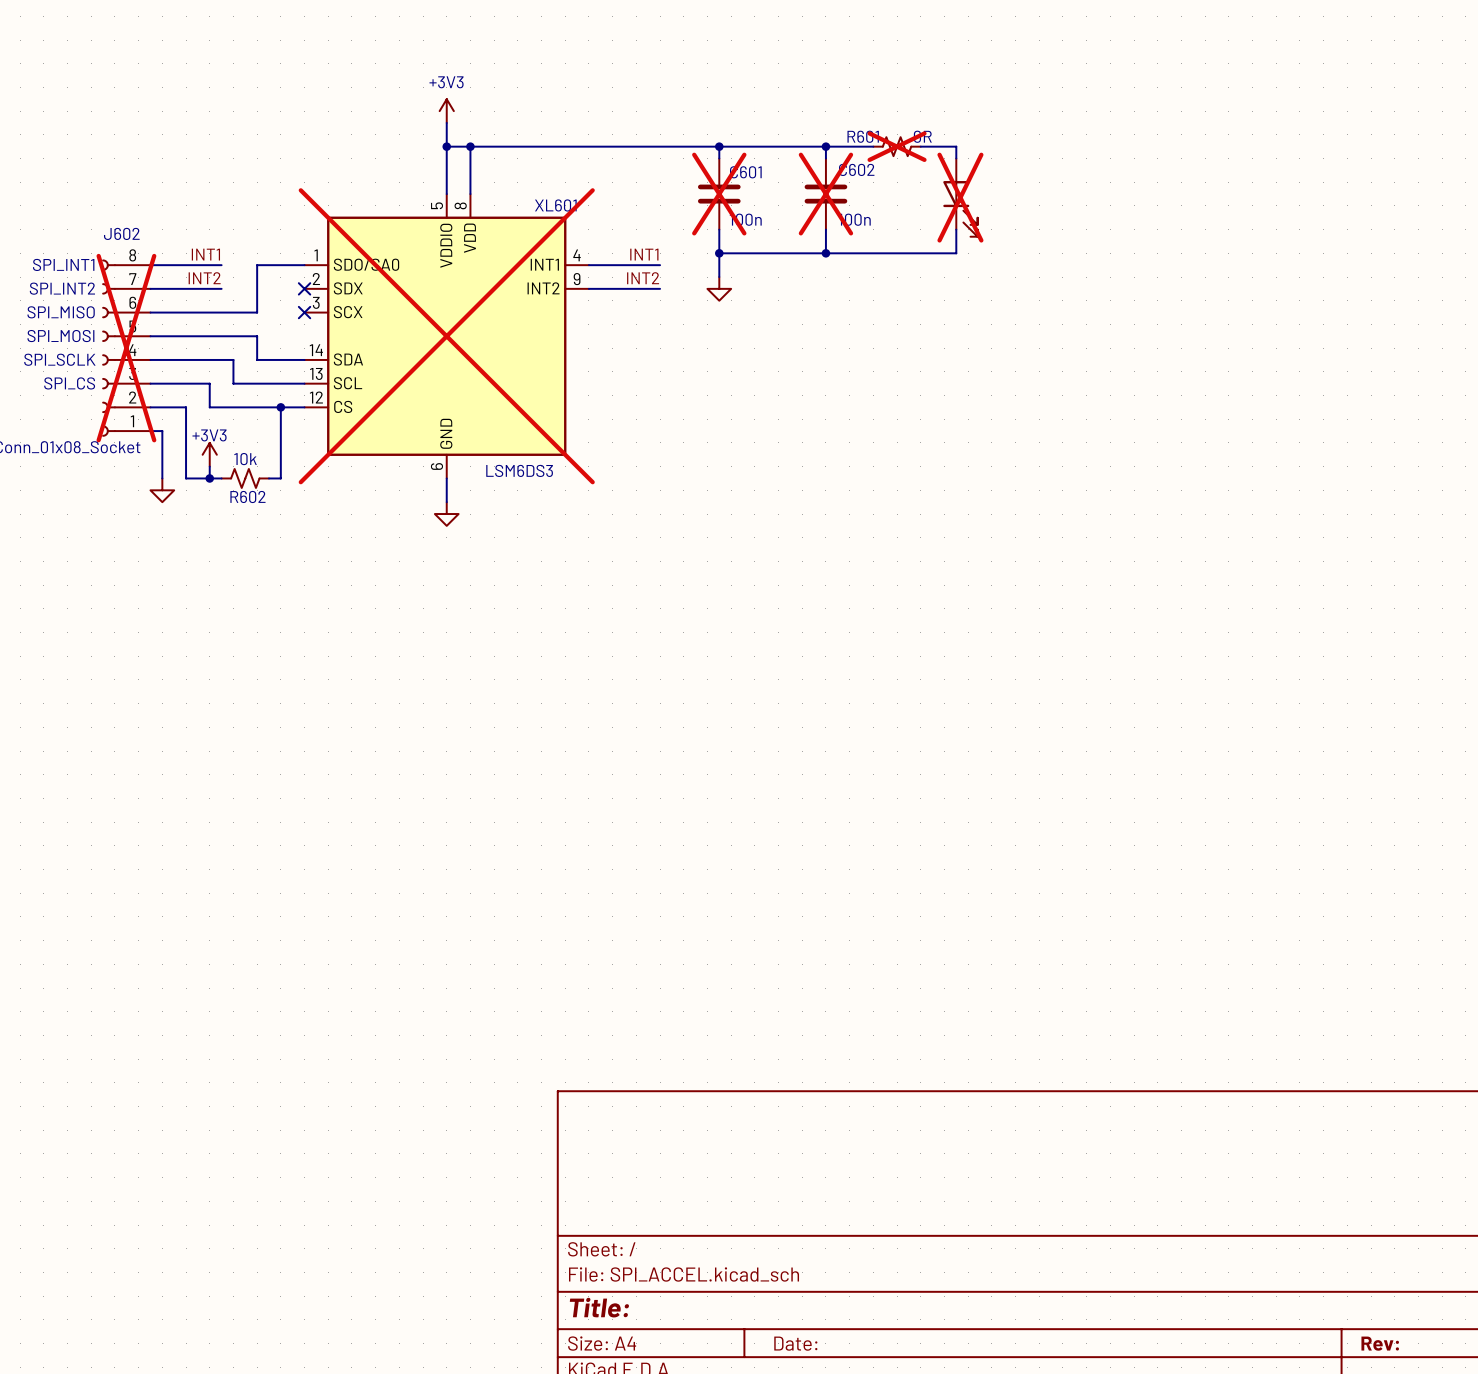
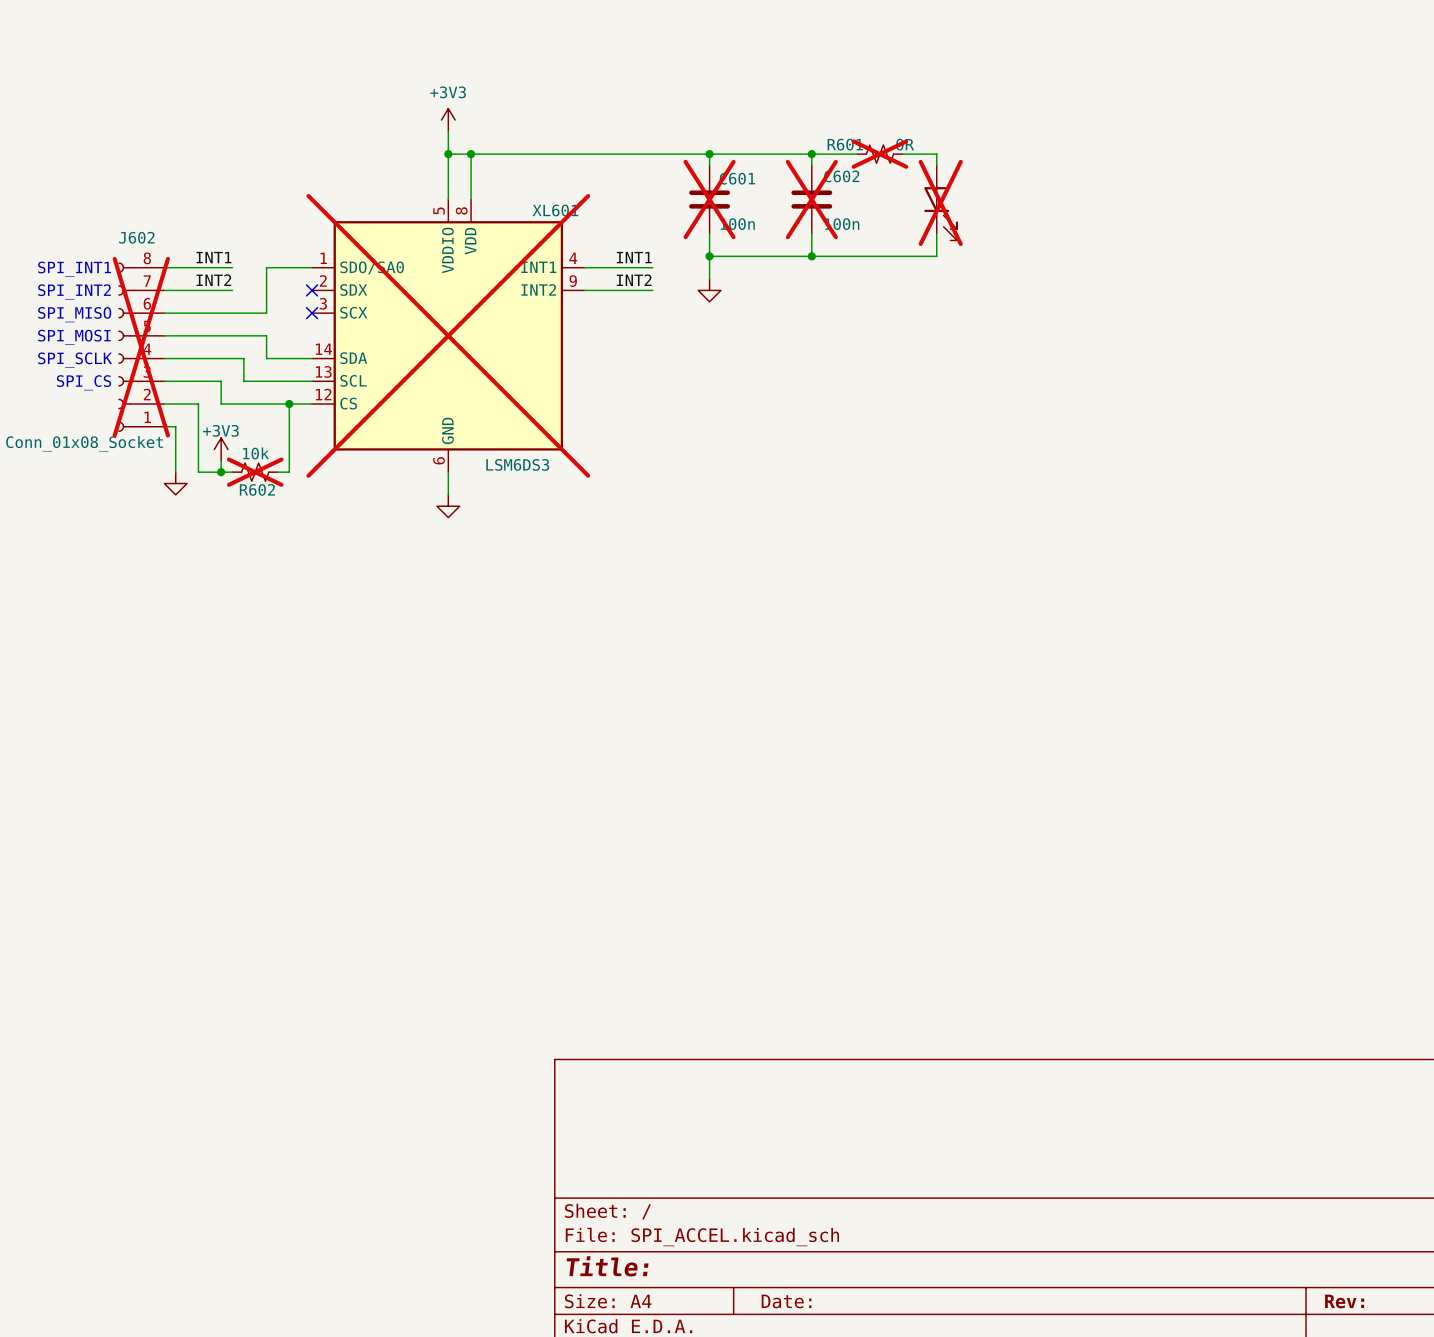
R602 do-not-place cross: none -> (255, 472)

